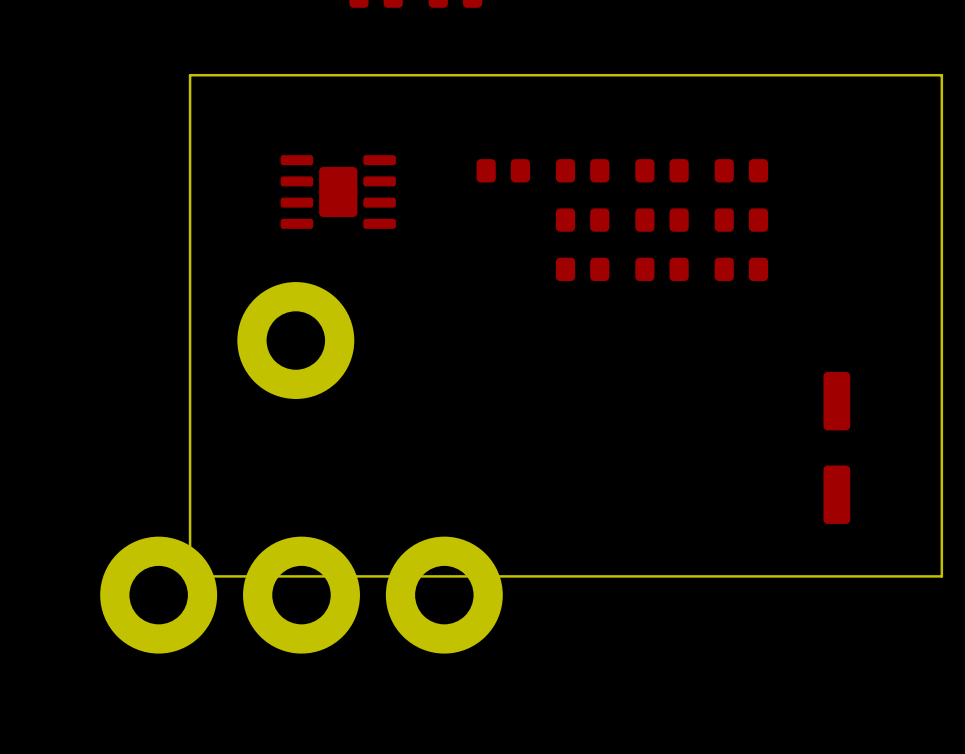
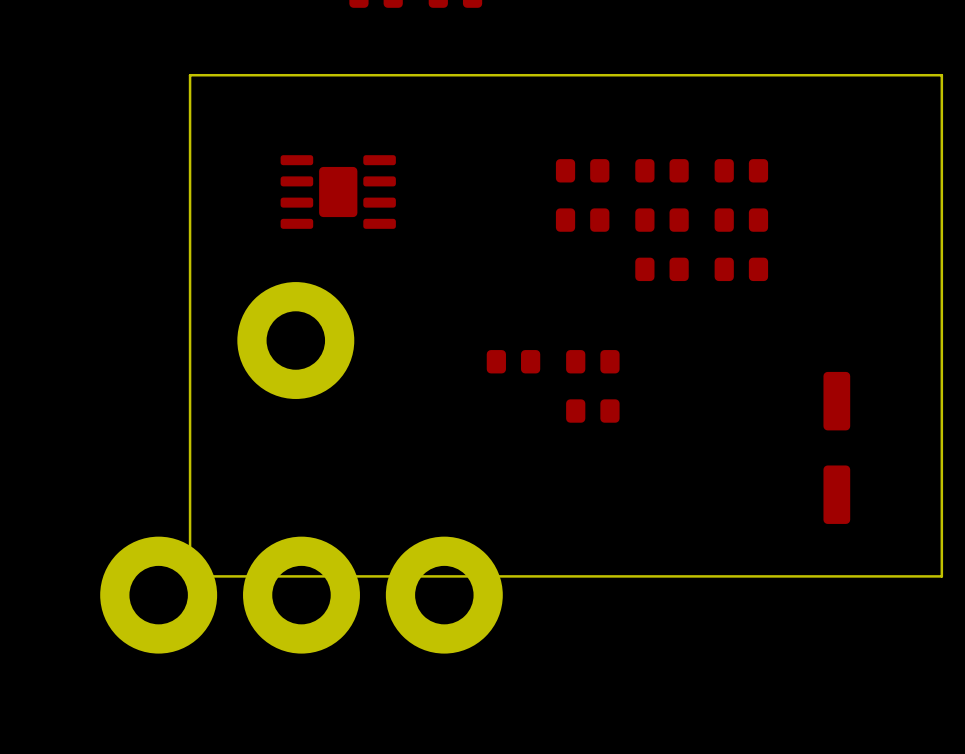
part: (503, 170) -> none
part: (582, 269) -> none
part: none -> (513, 361)
part: none -> (592, 361)
part: none -> (592, 411)

